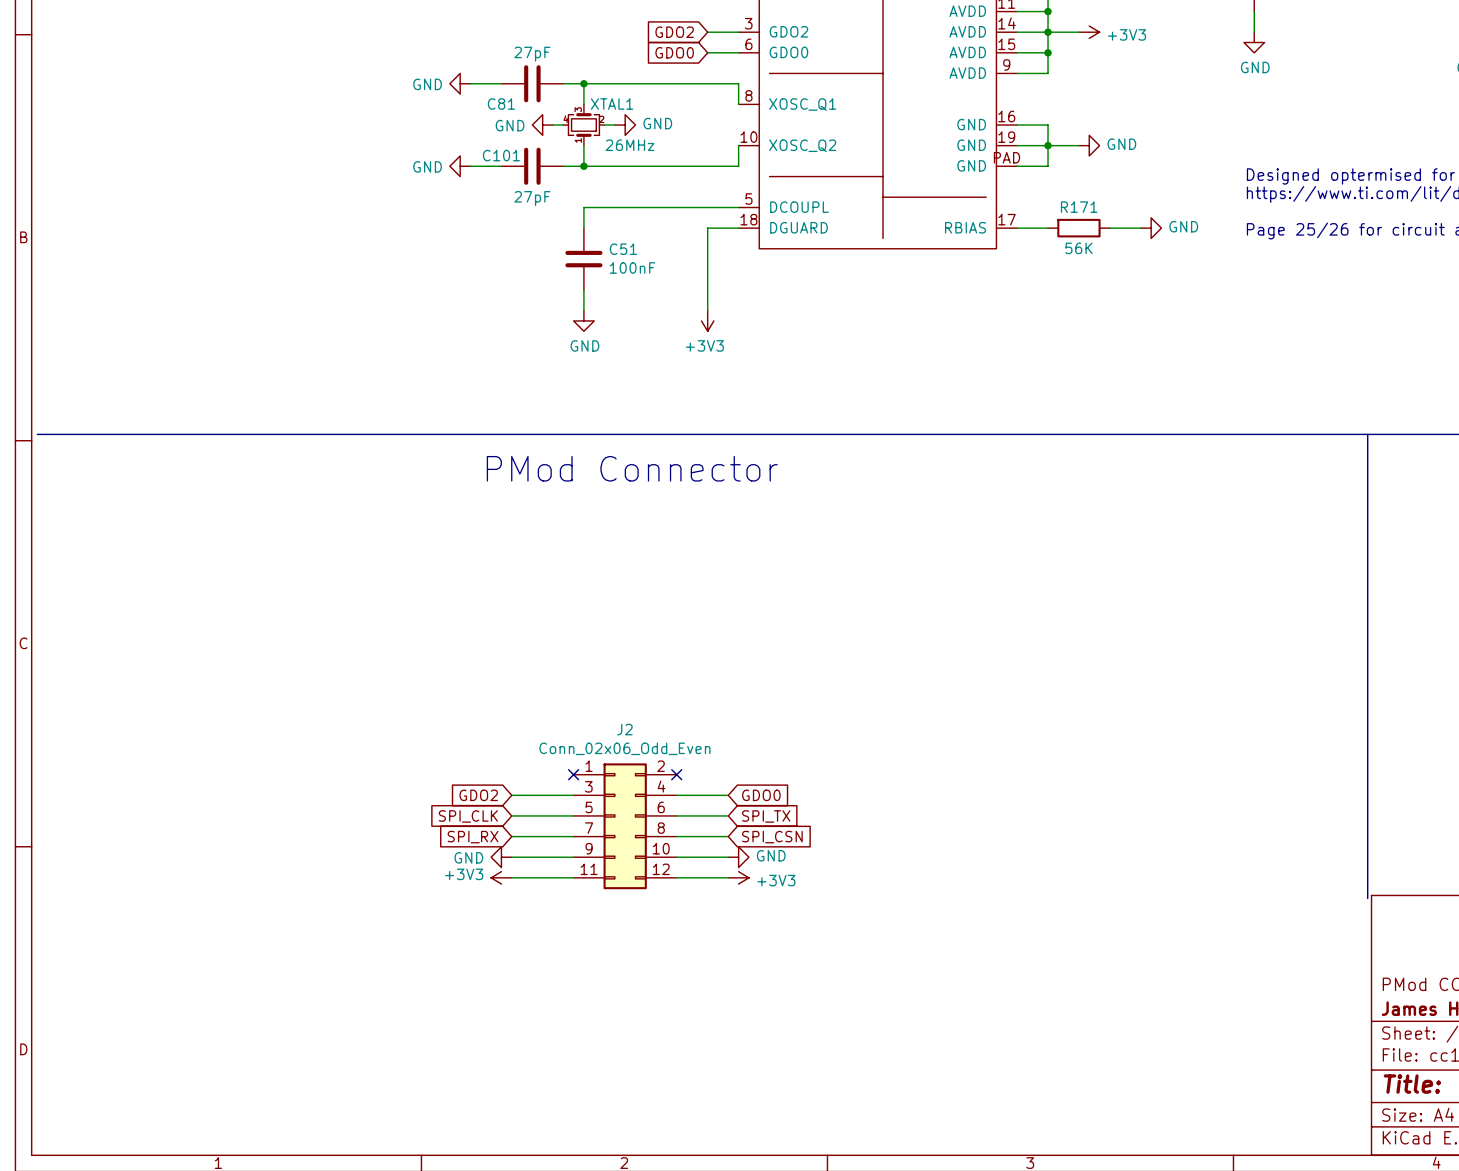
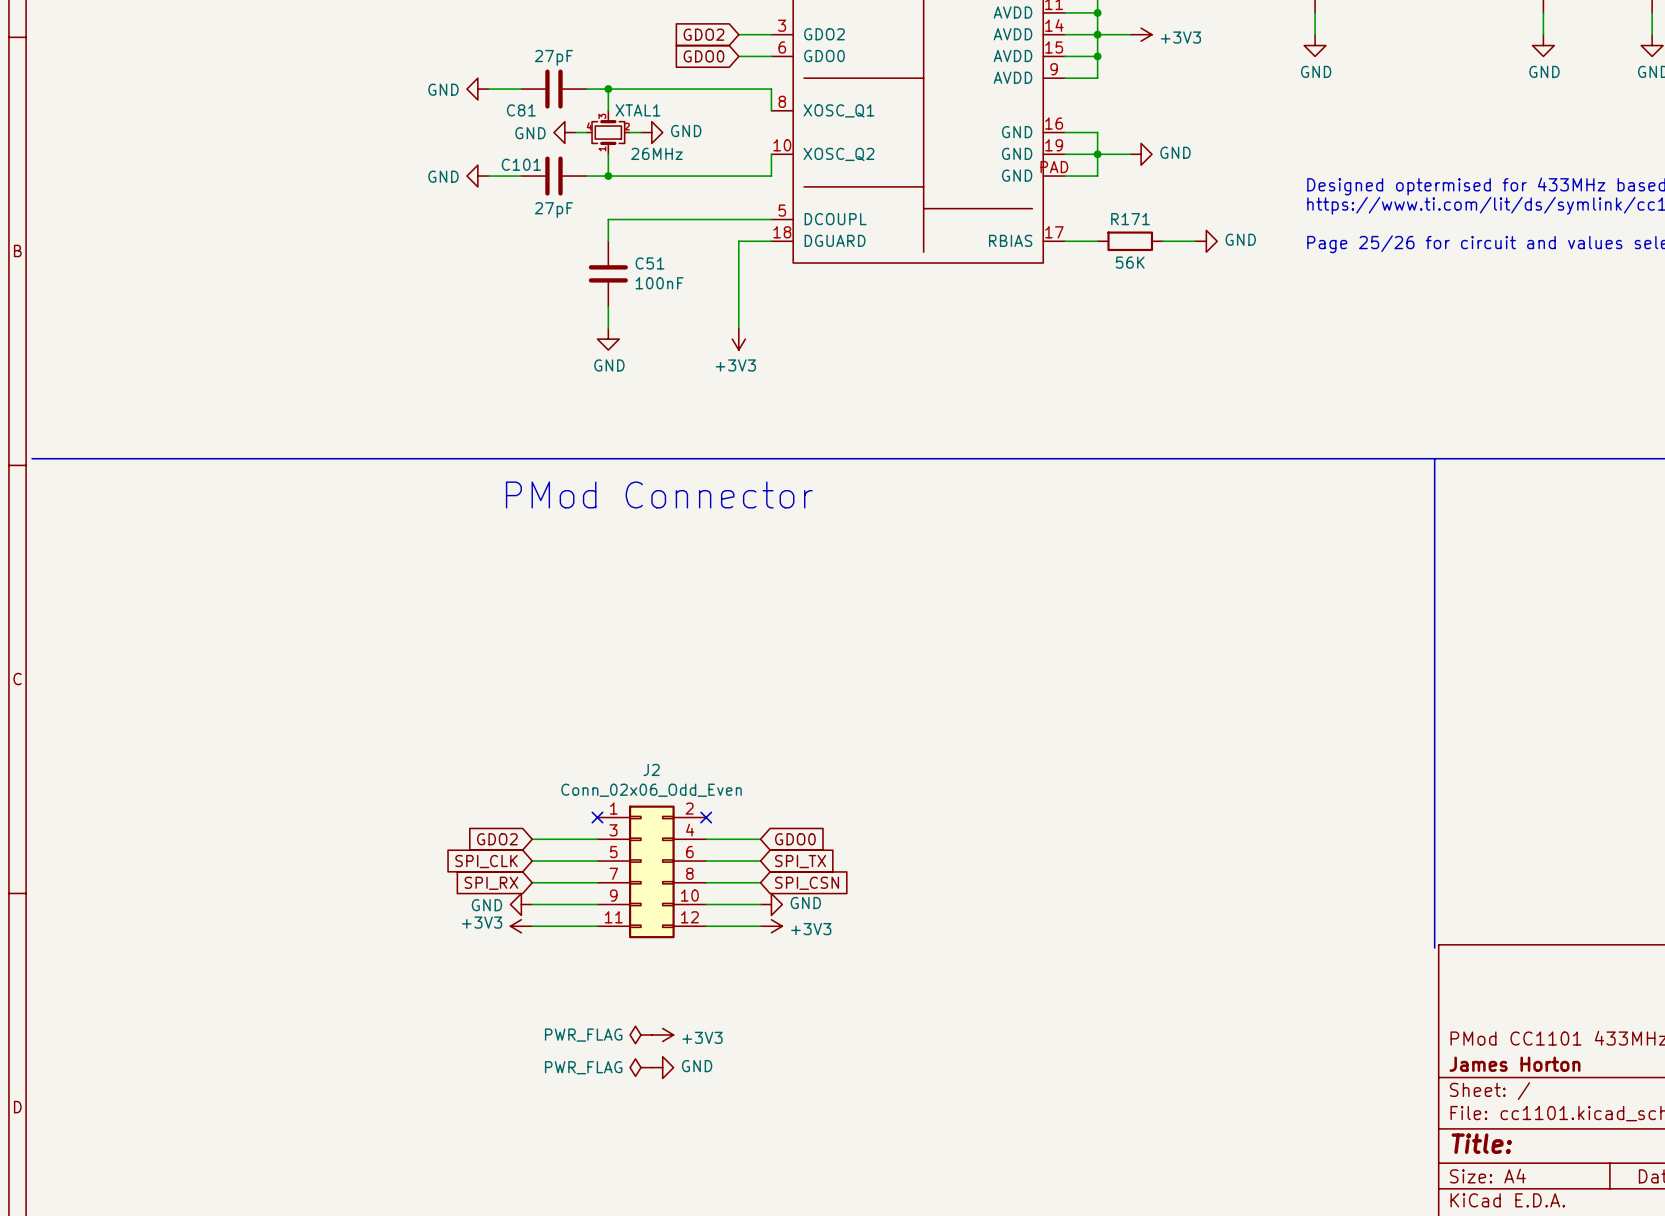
power symbol: none -> PWR_FLAG (640, 1034)
power symbol: none -> +3V3 (662, 1034)
power symbol: none -> PWR_FLAG (640, 1067)
power symbol: none -> GND (662, 1067)

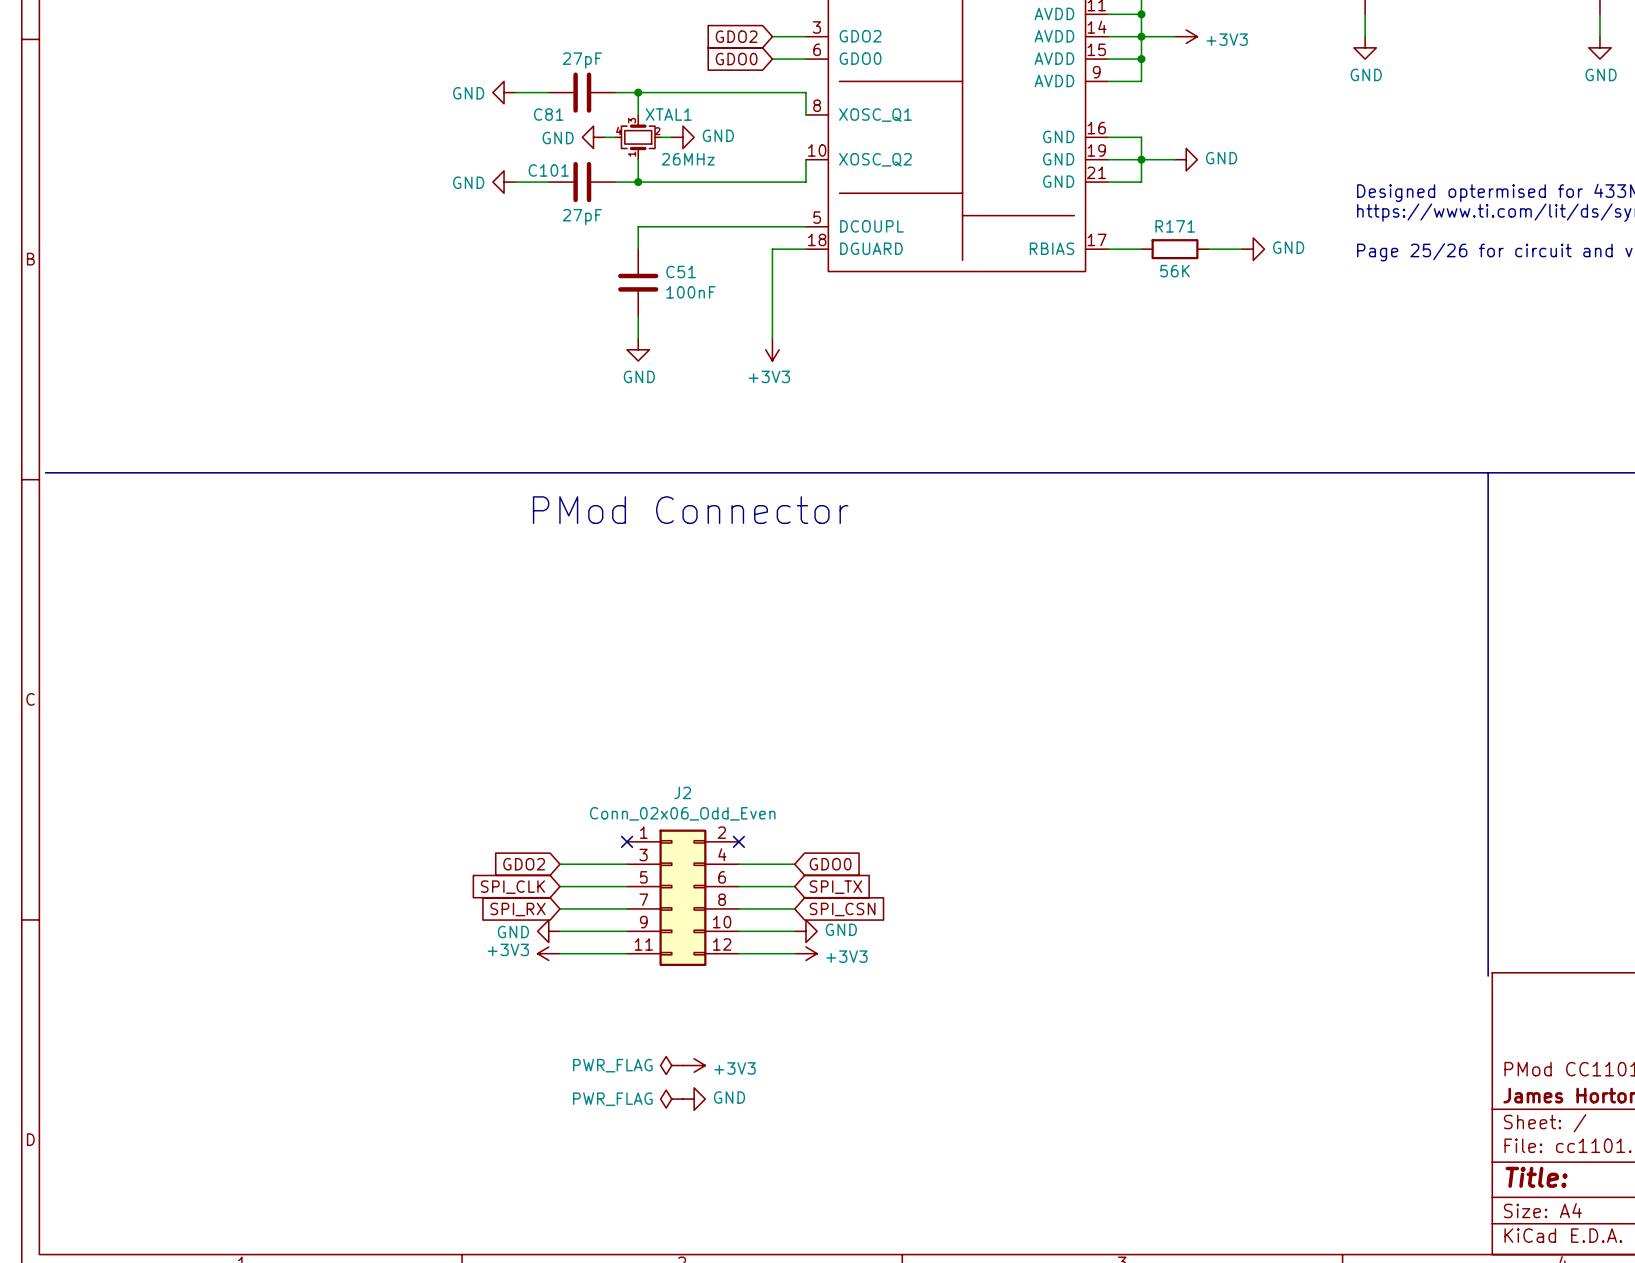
part pin number: PAD (1054, 167) -> 21 (1096, 172)

